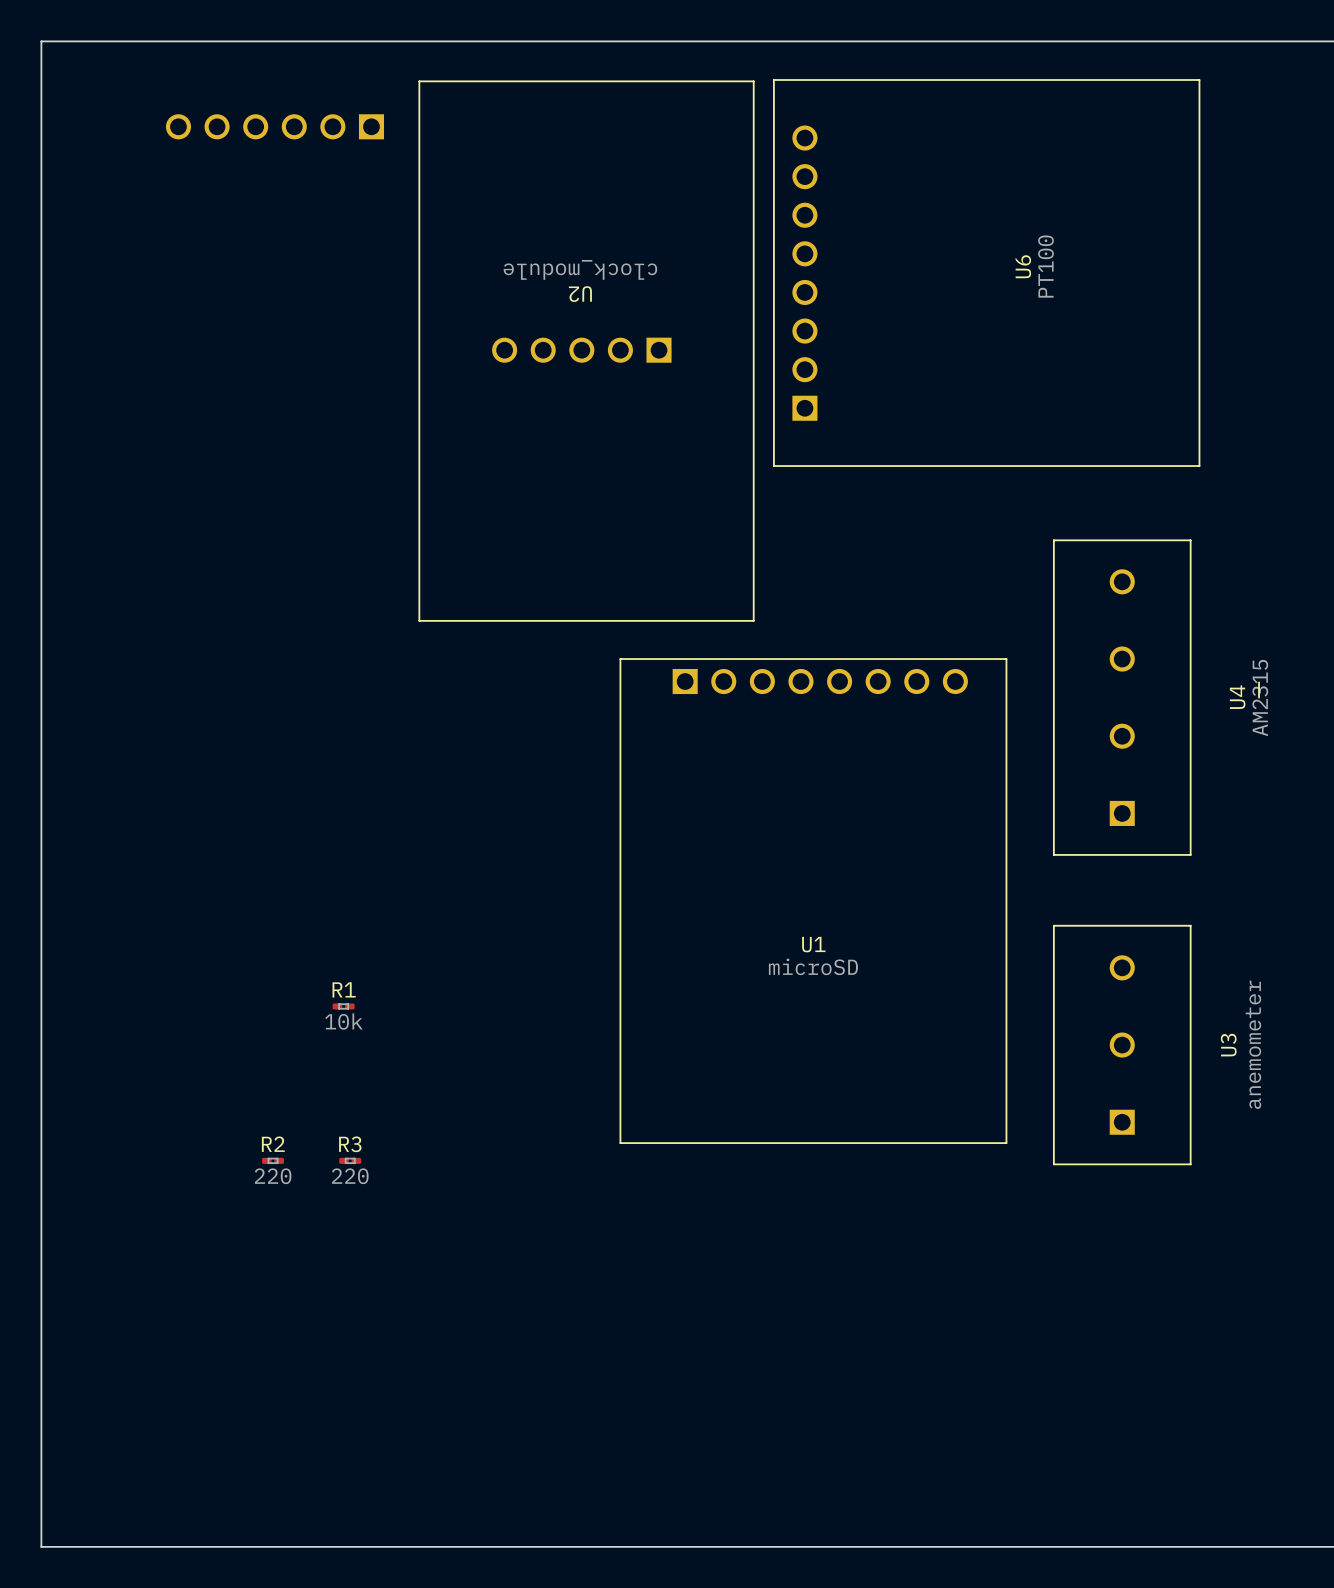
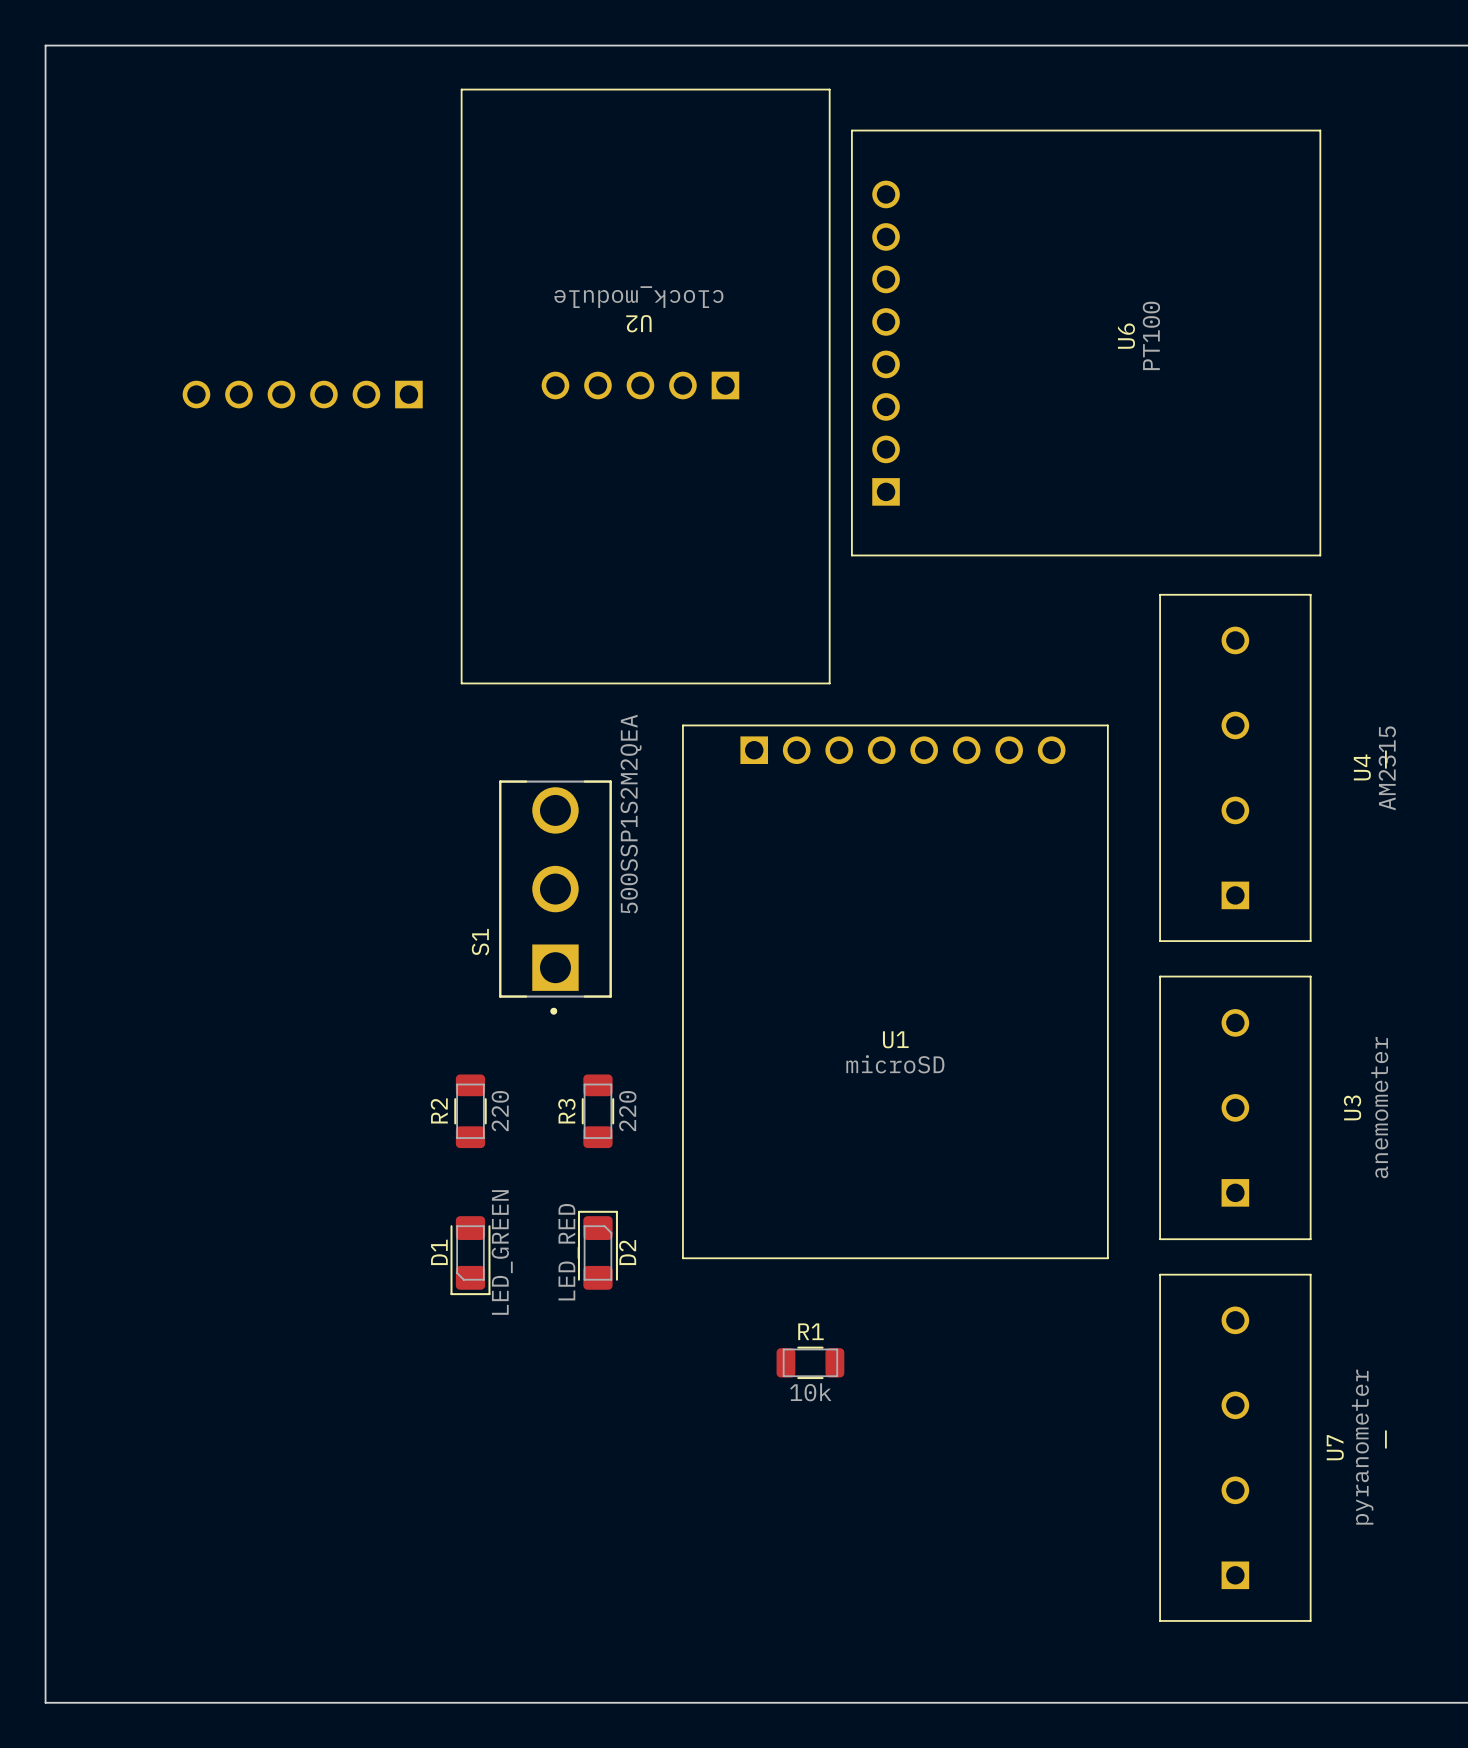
part position: (274, 126) -> (302, 394)
U6 position: (986, 273) -> (1086, 343)
S1: none -> 500SSP1S2M2QEA (555, 897)
R1 footprint: [332, 1003, 355, 1010] -> [776, 1346, 845, 1380]
U3 position: (1122, 1045) -> (1235, 1107)
D2: none -> LED_RED (597, 1250)
D1: none -> LED_GREEN (470, 1255)
R2 name position: R2 (273, 1144) -> R2 (439, 1110)
R3 name position: R3 (350, 1144) -> R3 (566, 1111)
R2 footprint: [261, 1157, 285, 1164] -> [454, 1074, 487, 1149]
R3 footprint: [339, 1157, 362, 1164] -> [581, 1074, 615, 1149]
R2 value position: 220 (273, 1176) -> 220 (500, 1111)
R3 value position: 220 (350, 1176) -> 220 (627, 1111)
U7: none -> pyranometer (1273, 1447)

